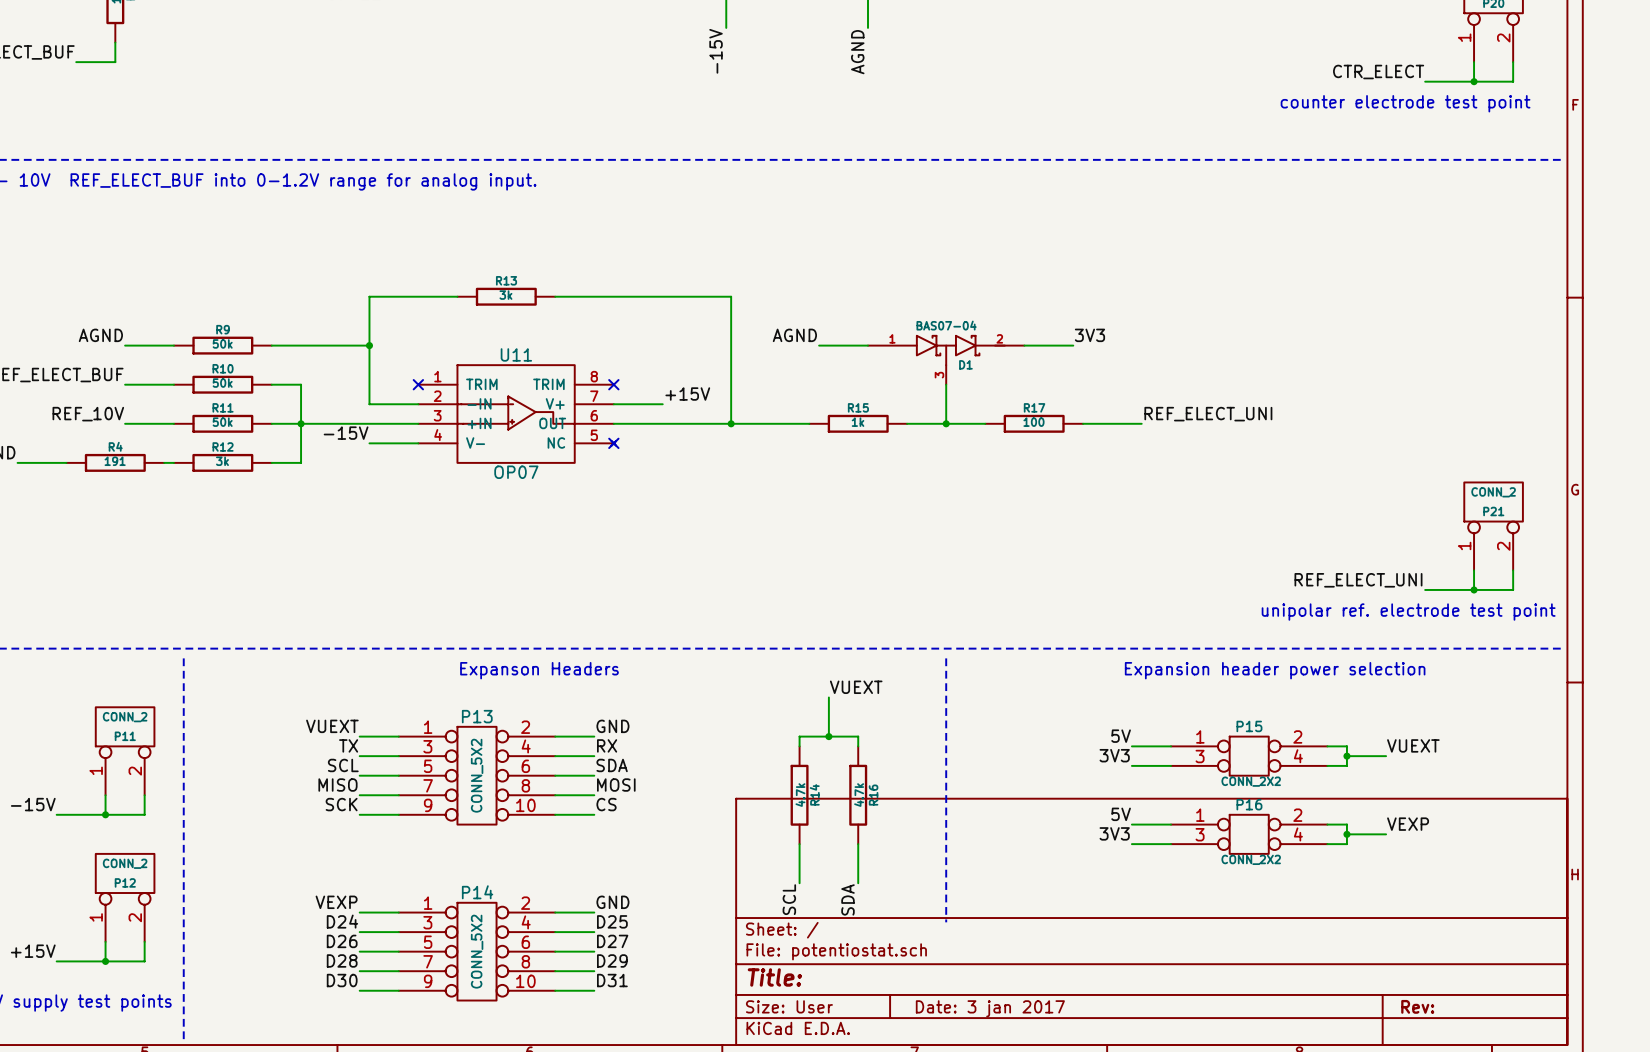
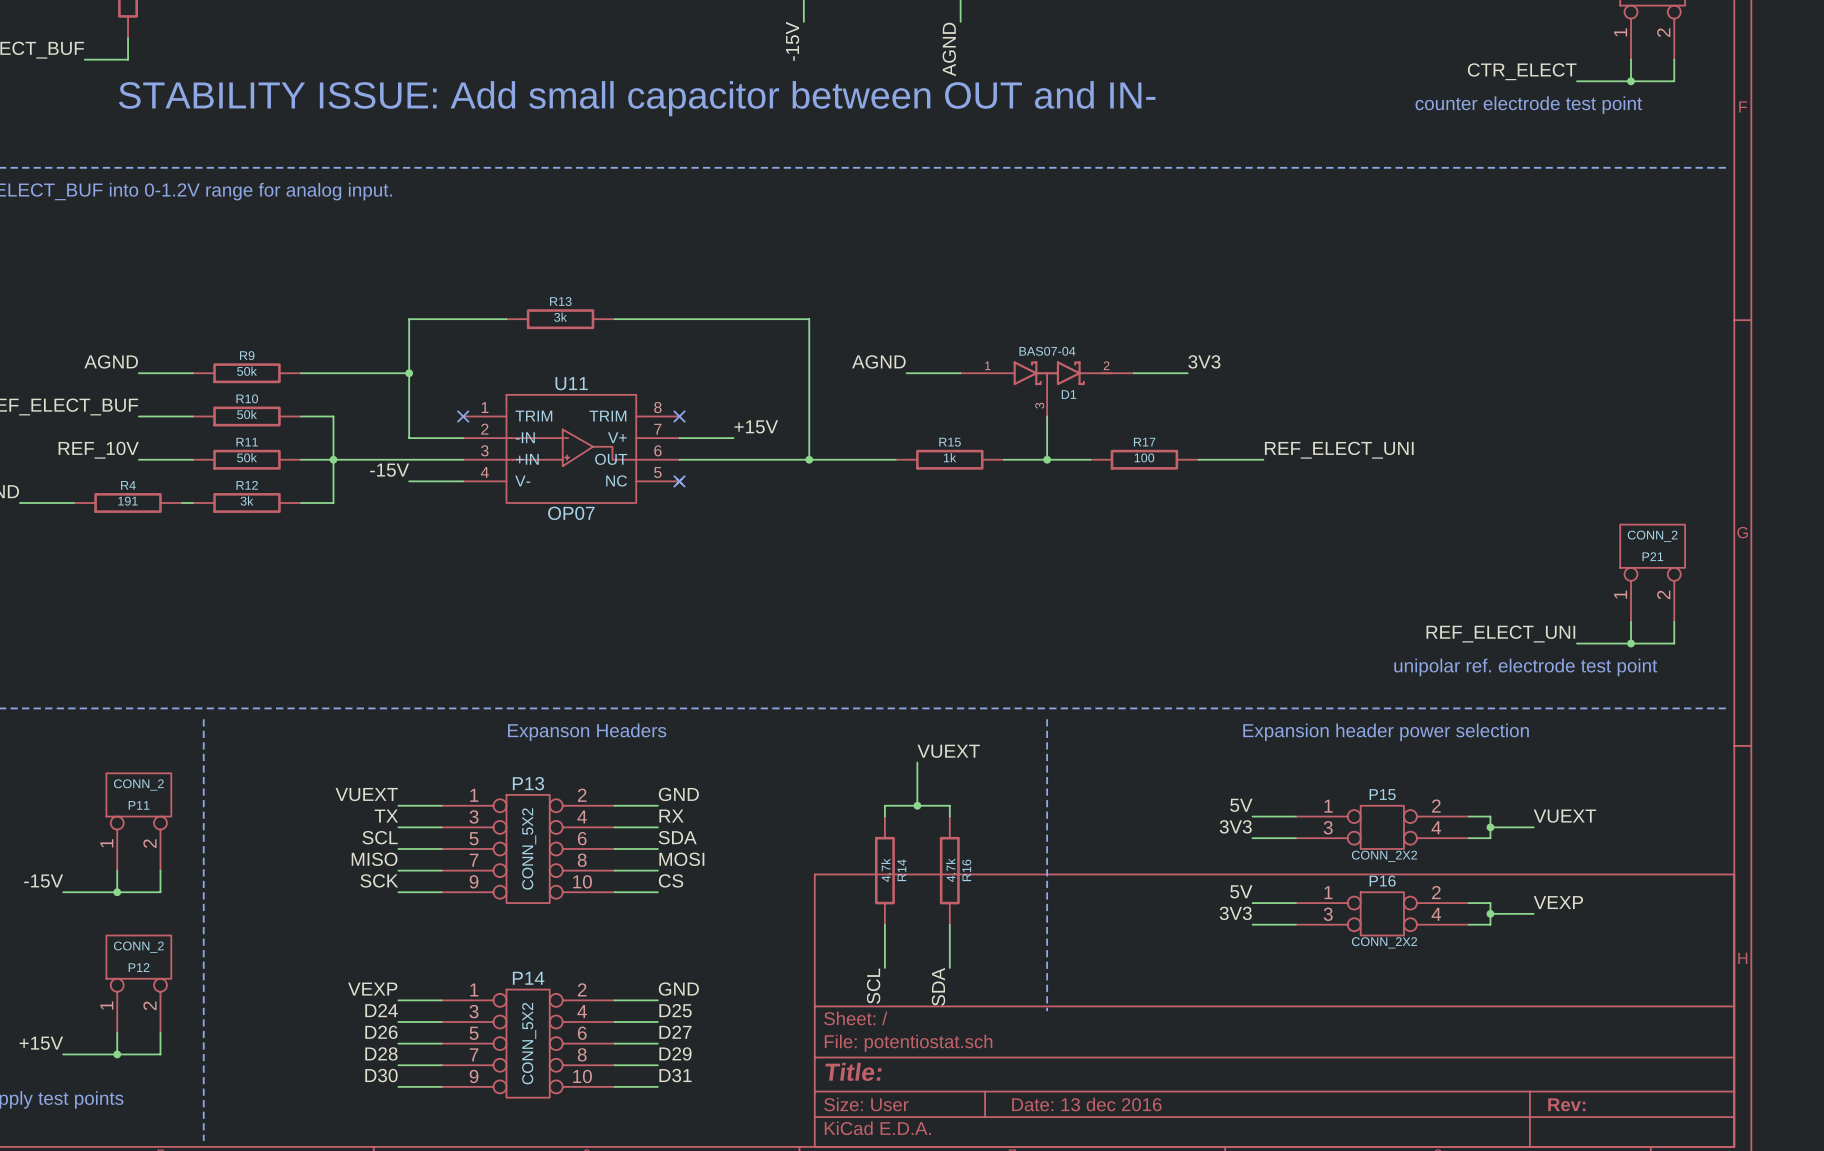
text: none -> STABILITY ISSUE: Add small capacitor between OUT and IN- (637, 98)
title block: Date: 3 jan 2017 (990, 1008) -> Date: 13 dec 2016 (1086, 1104)

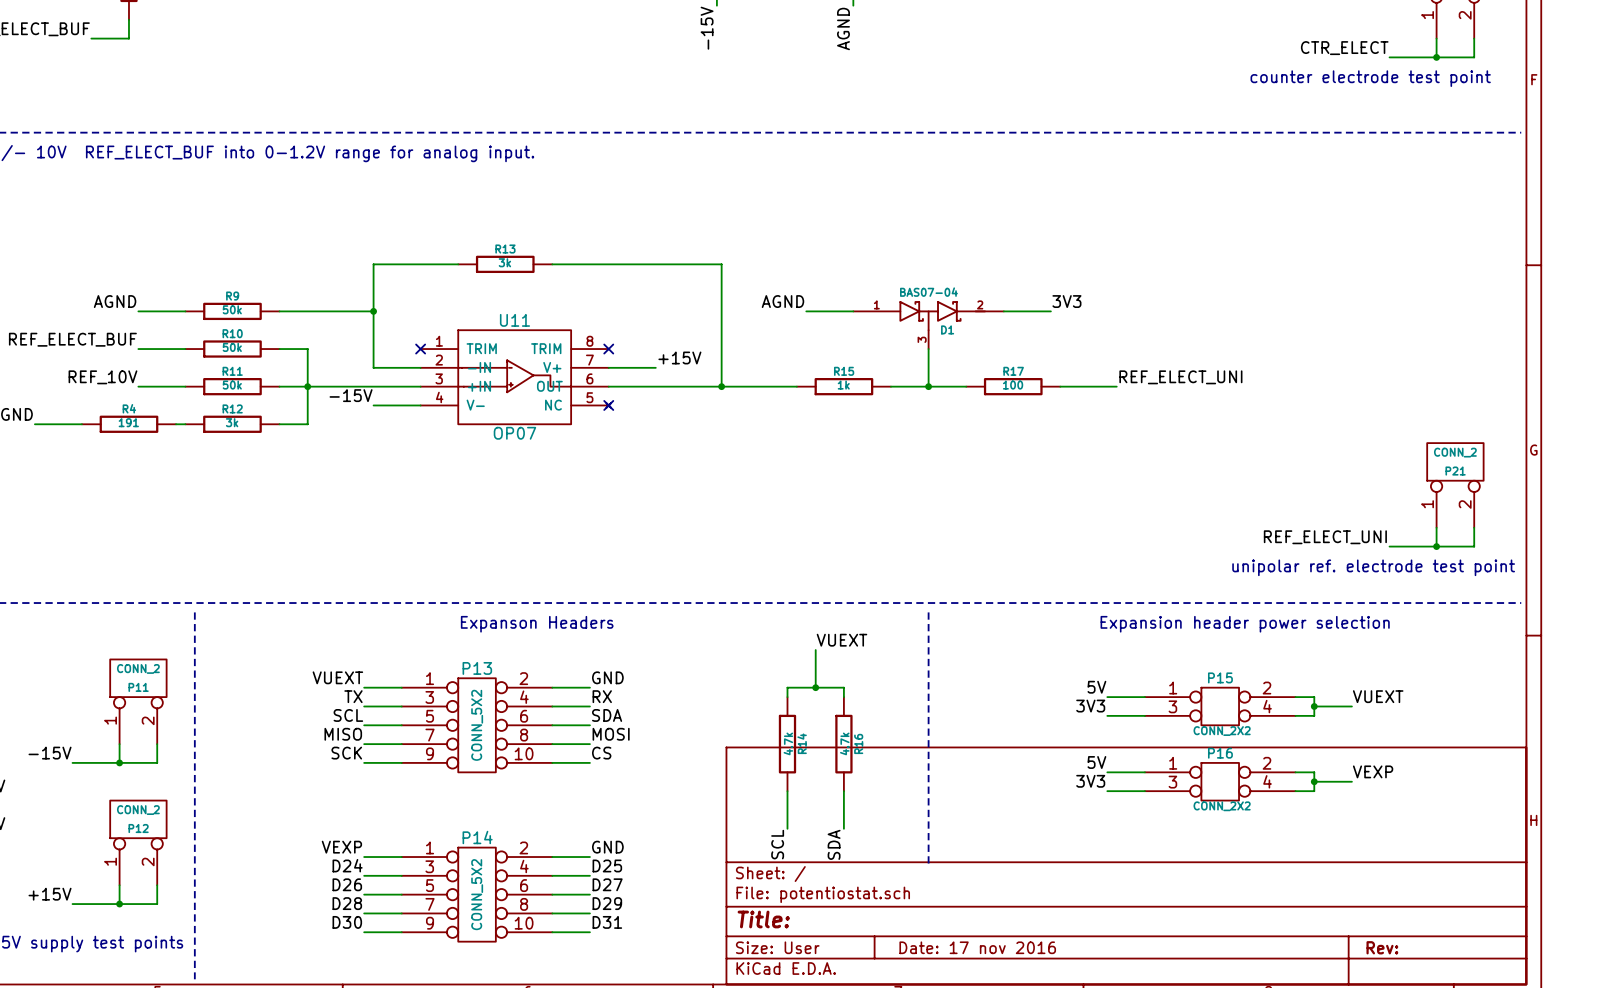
text: STABILITY ISSUE: Add small capacitor between OUT and IN- (637, 98) -> none
title block: Date: 13 dec 2016 (1086, 1104) -> Date: 17 nov 2016 (977, 947)

